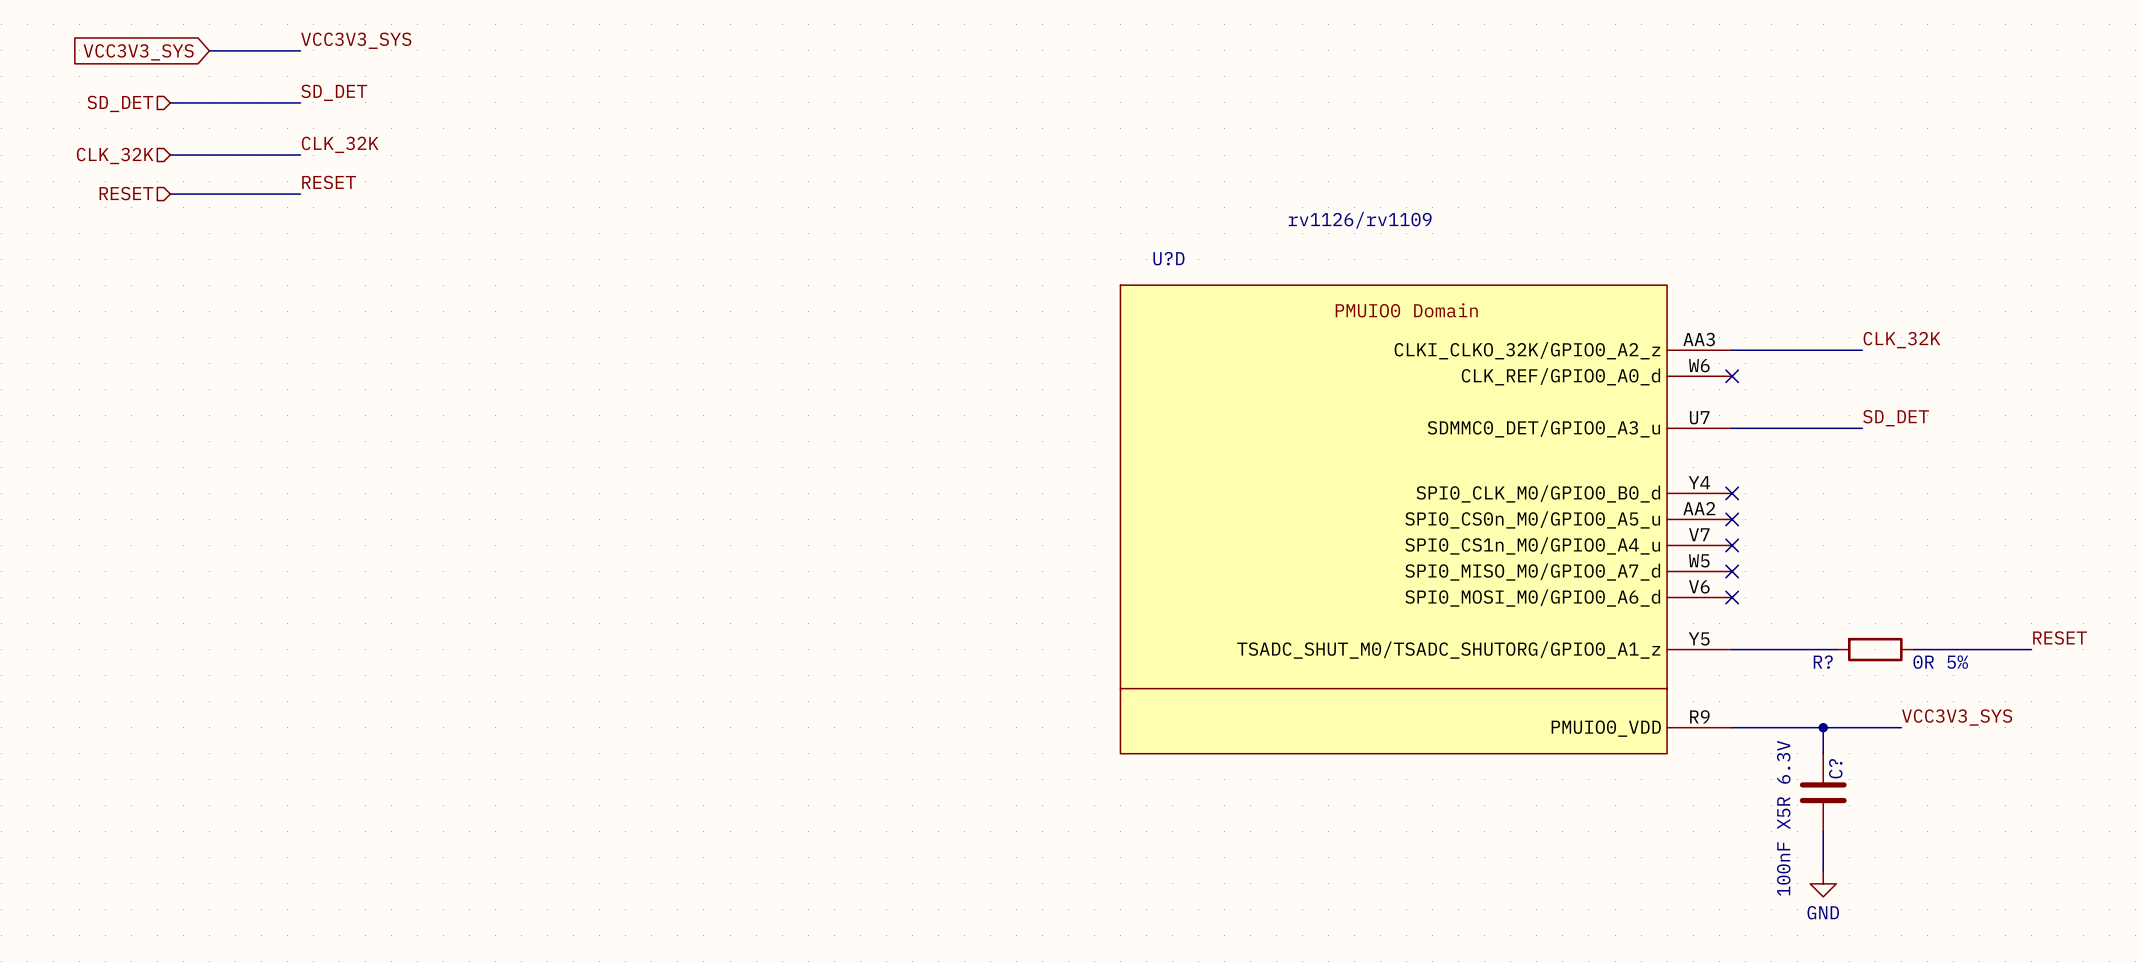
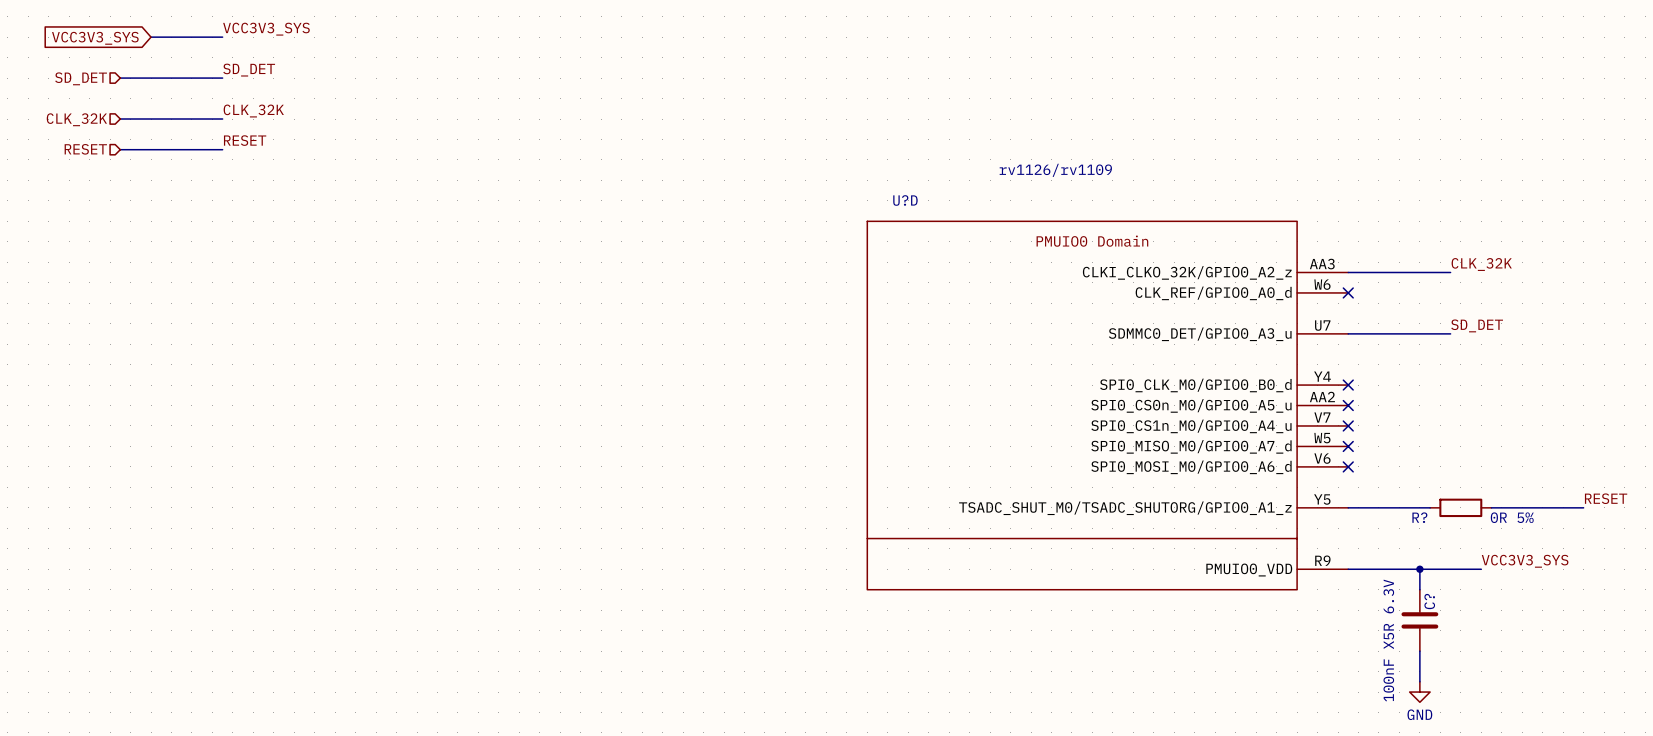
U?D symbol: [1120, 285, 1733, 754] -> [867, 221, 1349, 590]

